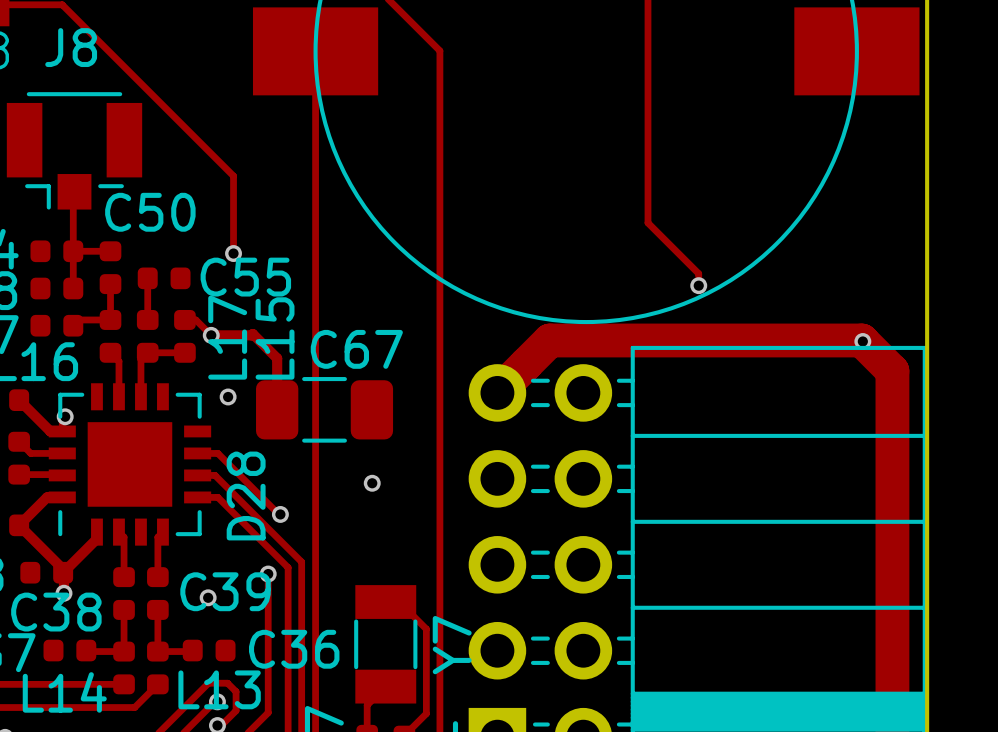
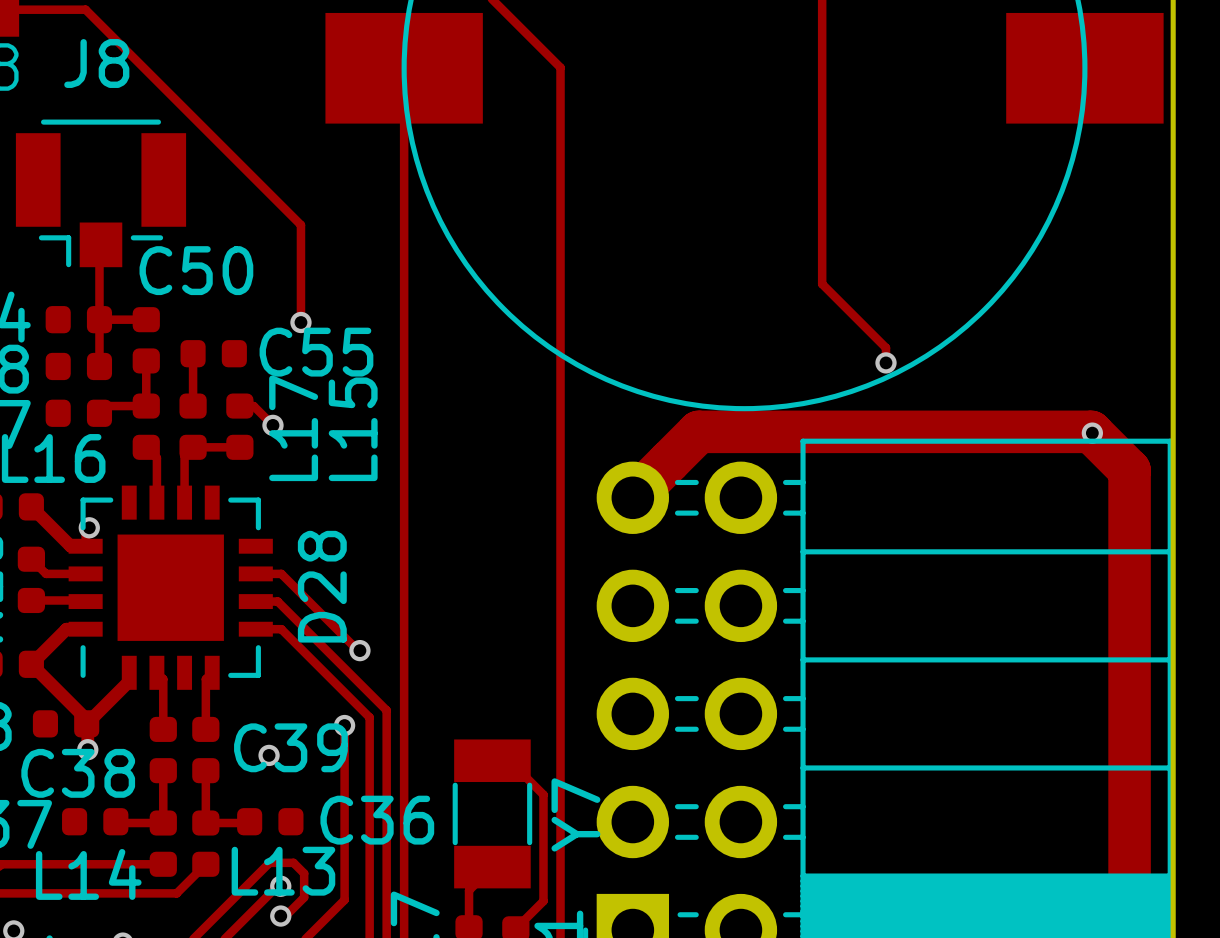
track: (211, 335) (252, 334) (277, 358) (277, 409) -> none
via: (228, 396) -> none
C67: (324, 409) -> none
via: (372, 483) -> none
D28 name position: D28 (246, 495) -> D28 (322, 586)

